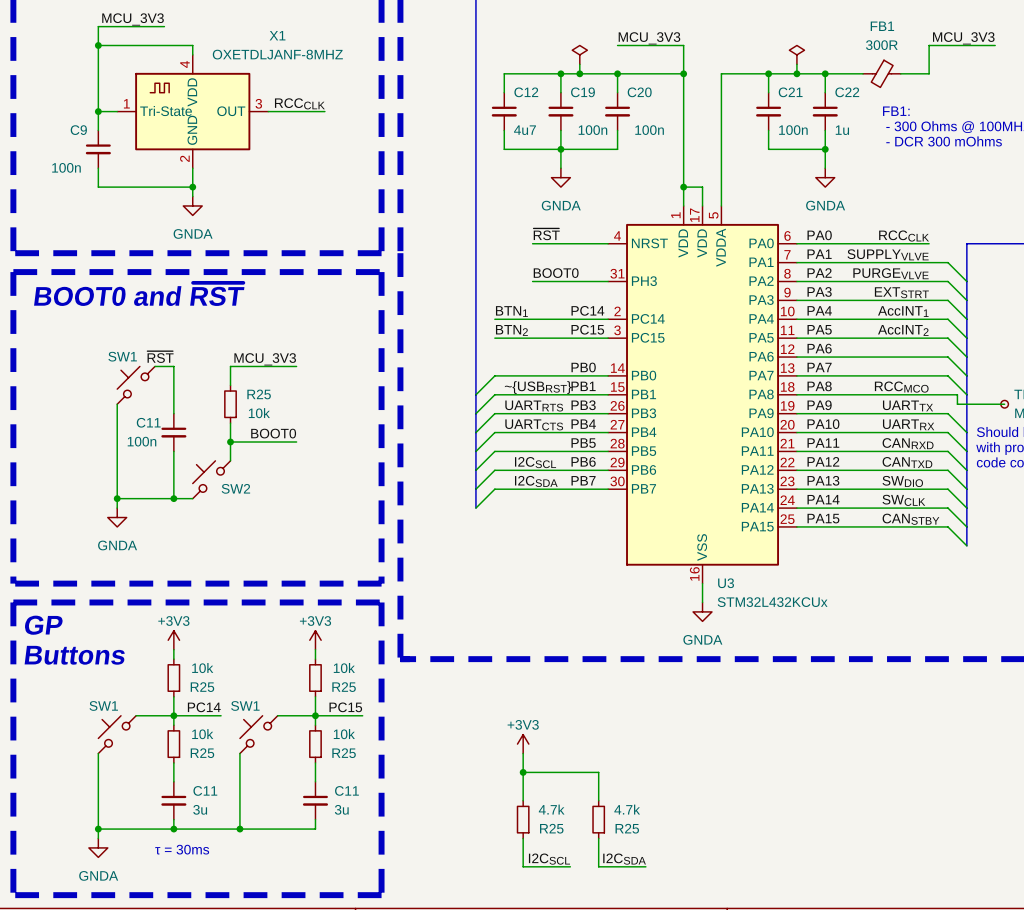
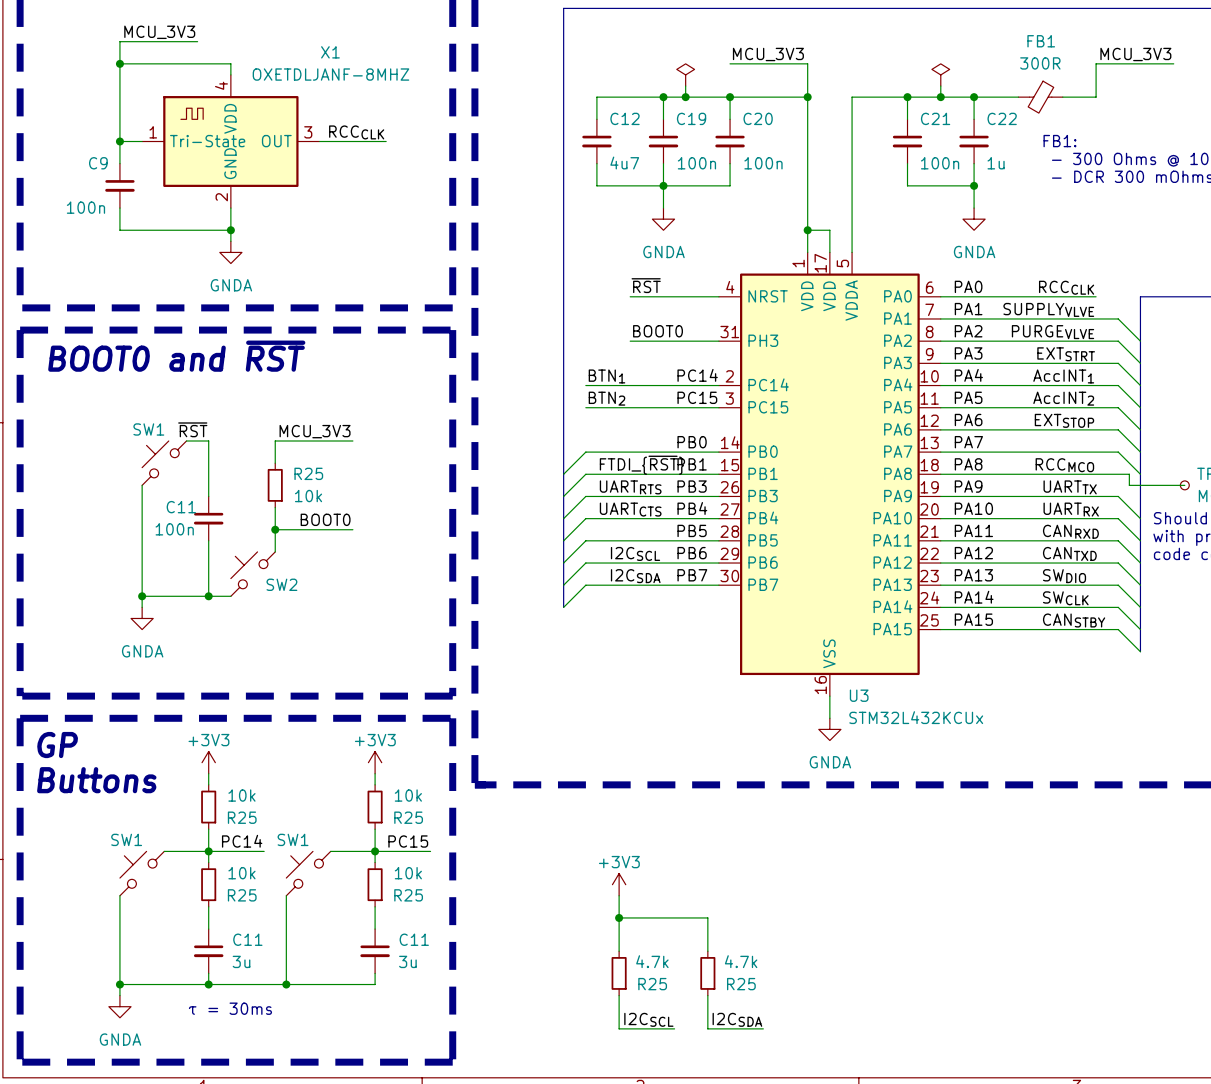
label: none -> EXTSTOP (1064, 420)
label: ~{USBRST} (538, 387) -> FTDI_{~{RST}} (641, 465)

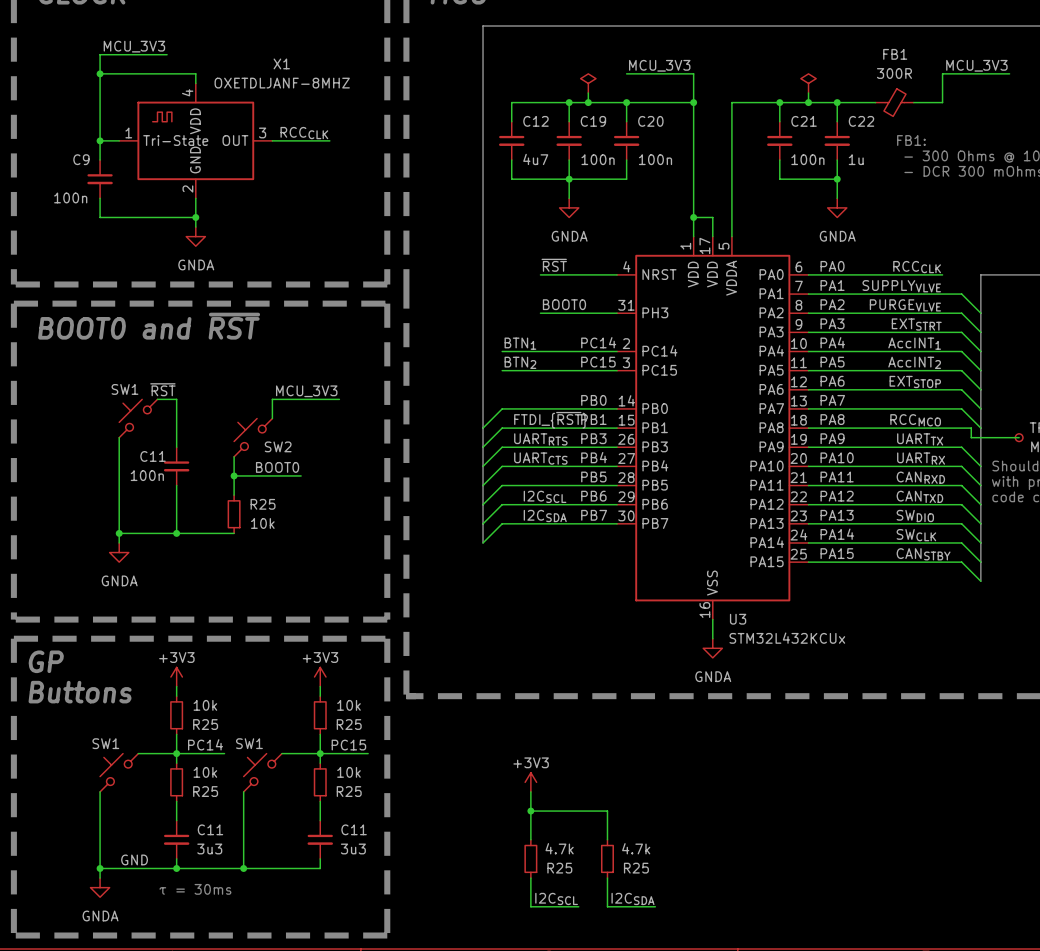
label position: MCU_3V3 (315, 431) -> MCU_3V3 (306, 391)
wire: (319, 440) (275, 440) (275, 463) -> (272, 399) (272, 418)
wire: none -> (301, 399) (339, 399)
R25 position: (275, 485) -> (234, 514)
SW2 position: (253, 574) -> (253, 437)
wire: none -> (195, 533) (234, 533)
C11 value: 3u (241, 961) -> 3u3 (209, 848)
C11 value: 3u (407, 961) -> 3u3 (353, 848)
label: none -> GND (134, 859)

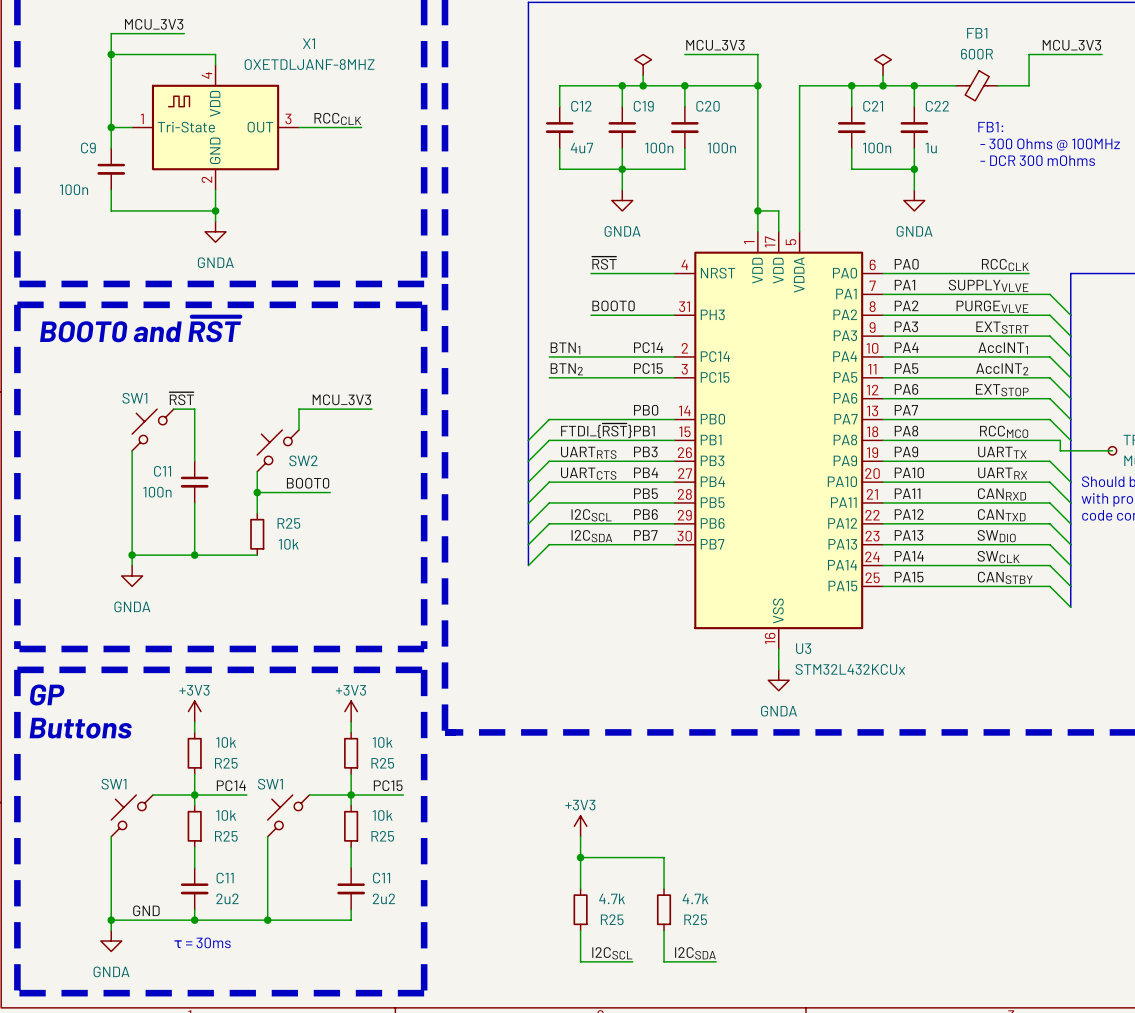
FB1 value: 300R (894, 73) -> 600R (977, 54)
C11 value: 3u3 (209, 848) -> 2u2 (227, 898)
C11 value: 3u3 (353, 848) -> 2u2 (383, 898)

